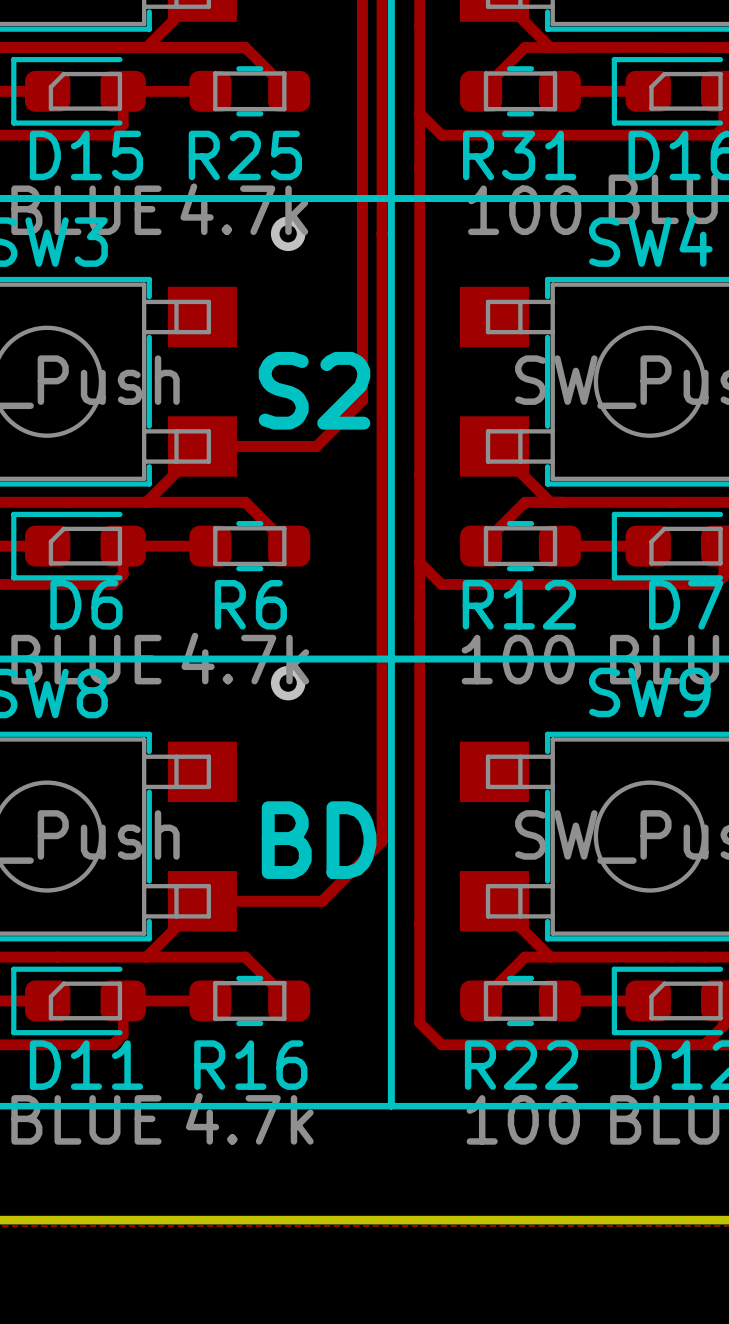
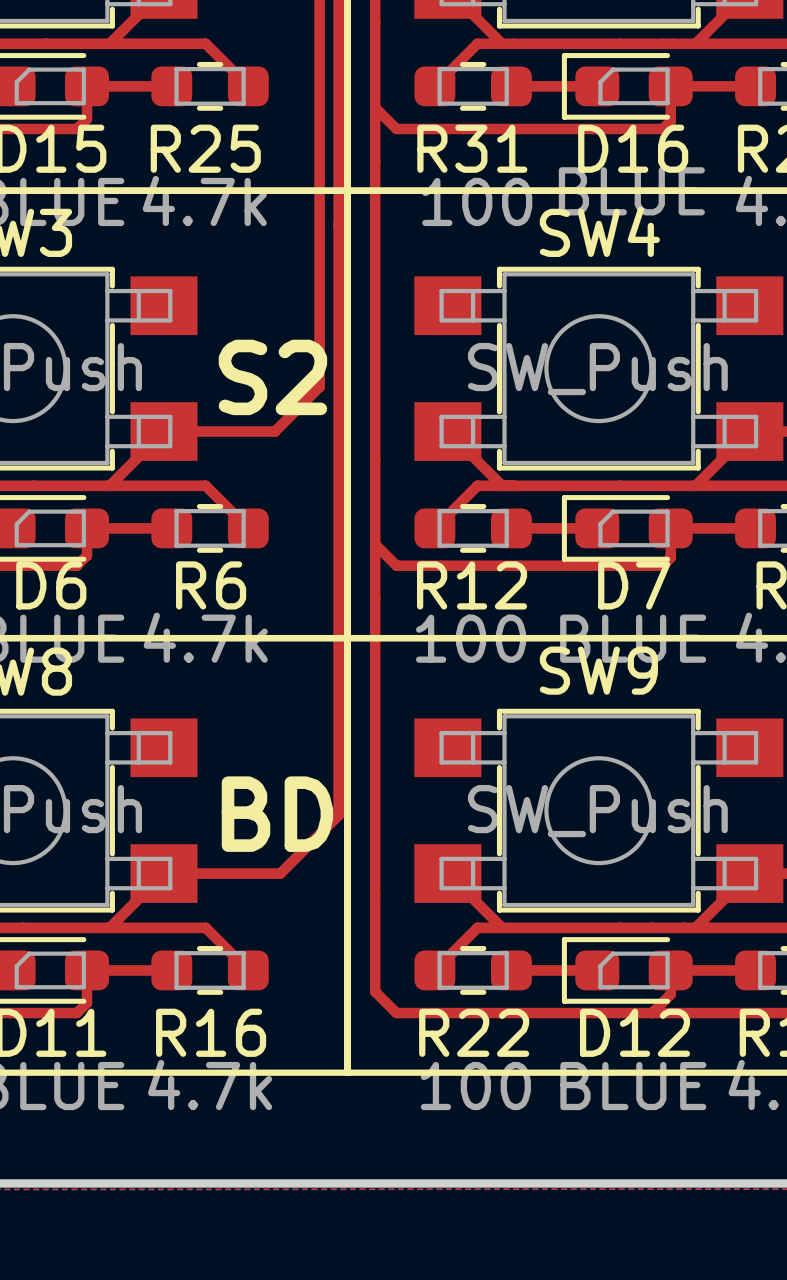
via: (288, 233) -> none
via: (288, 683) -> none

